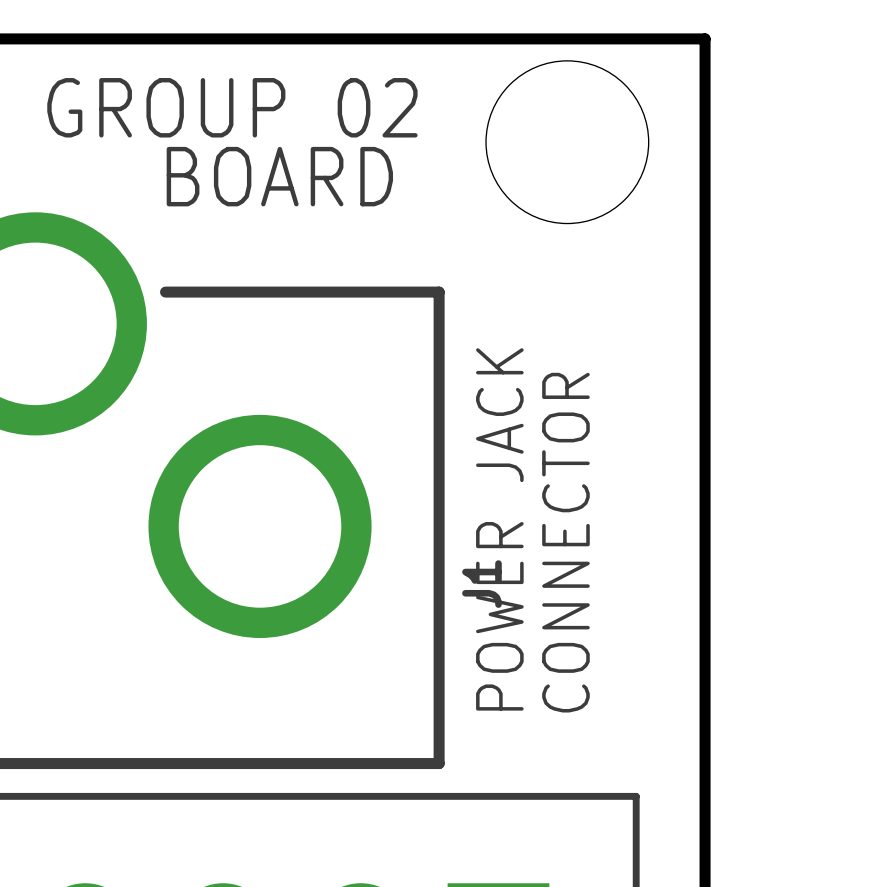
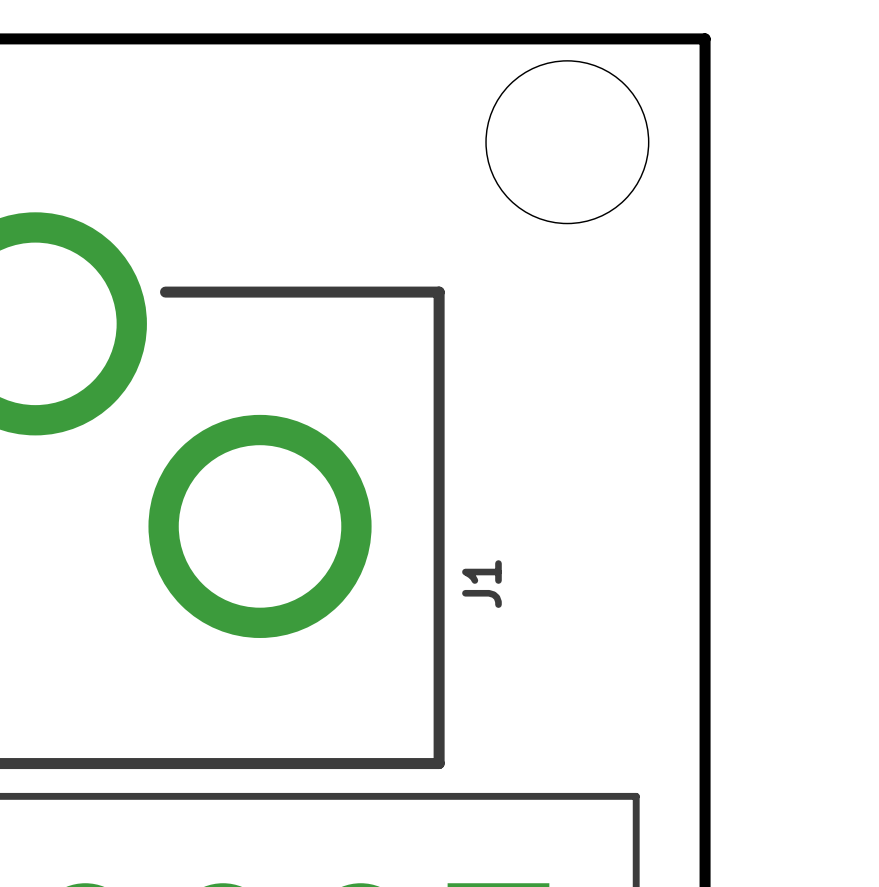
text: GROUP 02 (232, 107) -> none
text: BOARD (279, 176) -> none
text: POWER JACK (499, 529) -> none
text: CONNECTOR (565, 542) -> none

